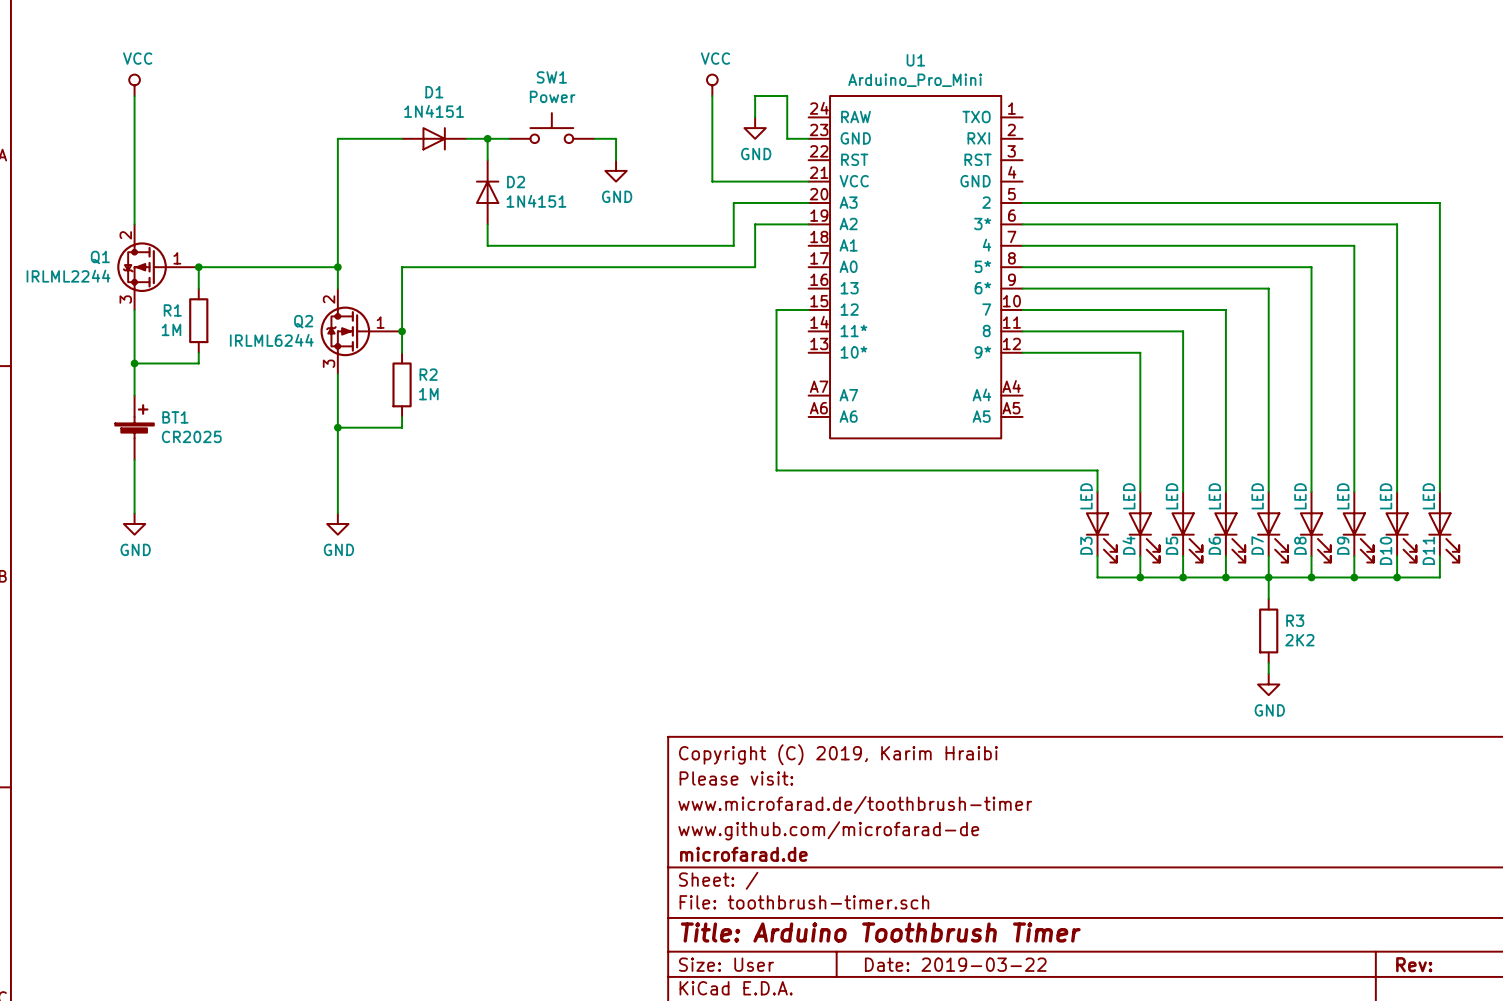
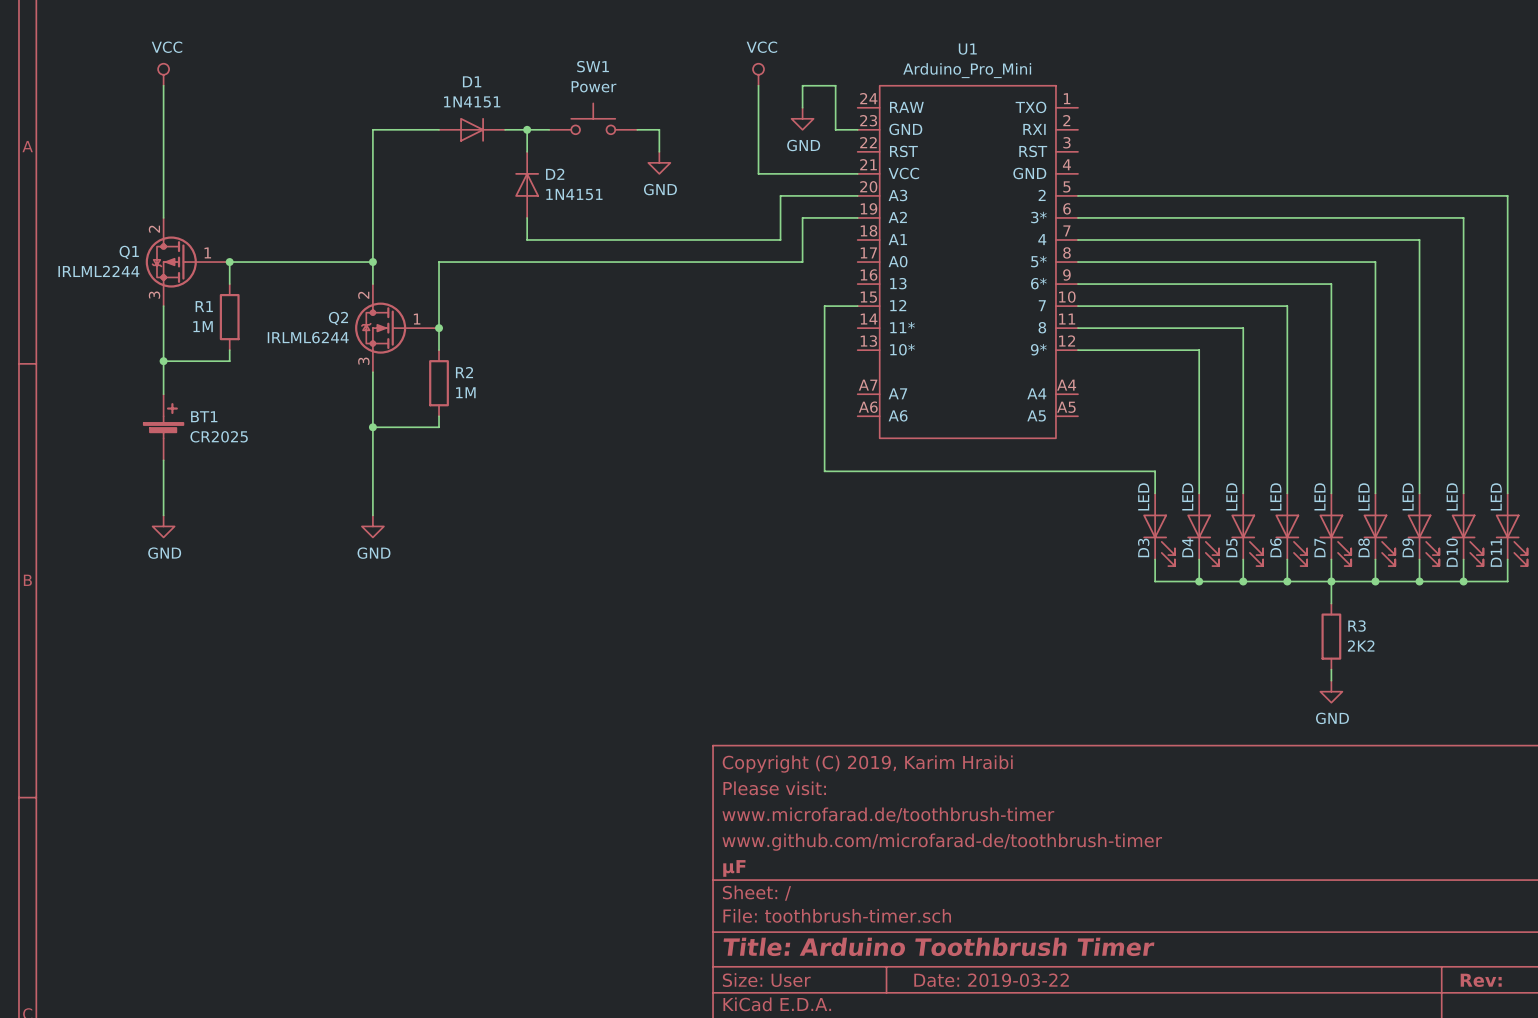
title block: www.github.com/microfarad-de (828, 830) -> www.github.com/microfarad-de/toothbrush-timer (942, 842)
title block: microfarad.de (743, 854) -> µF (734, 868)

